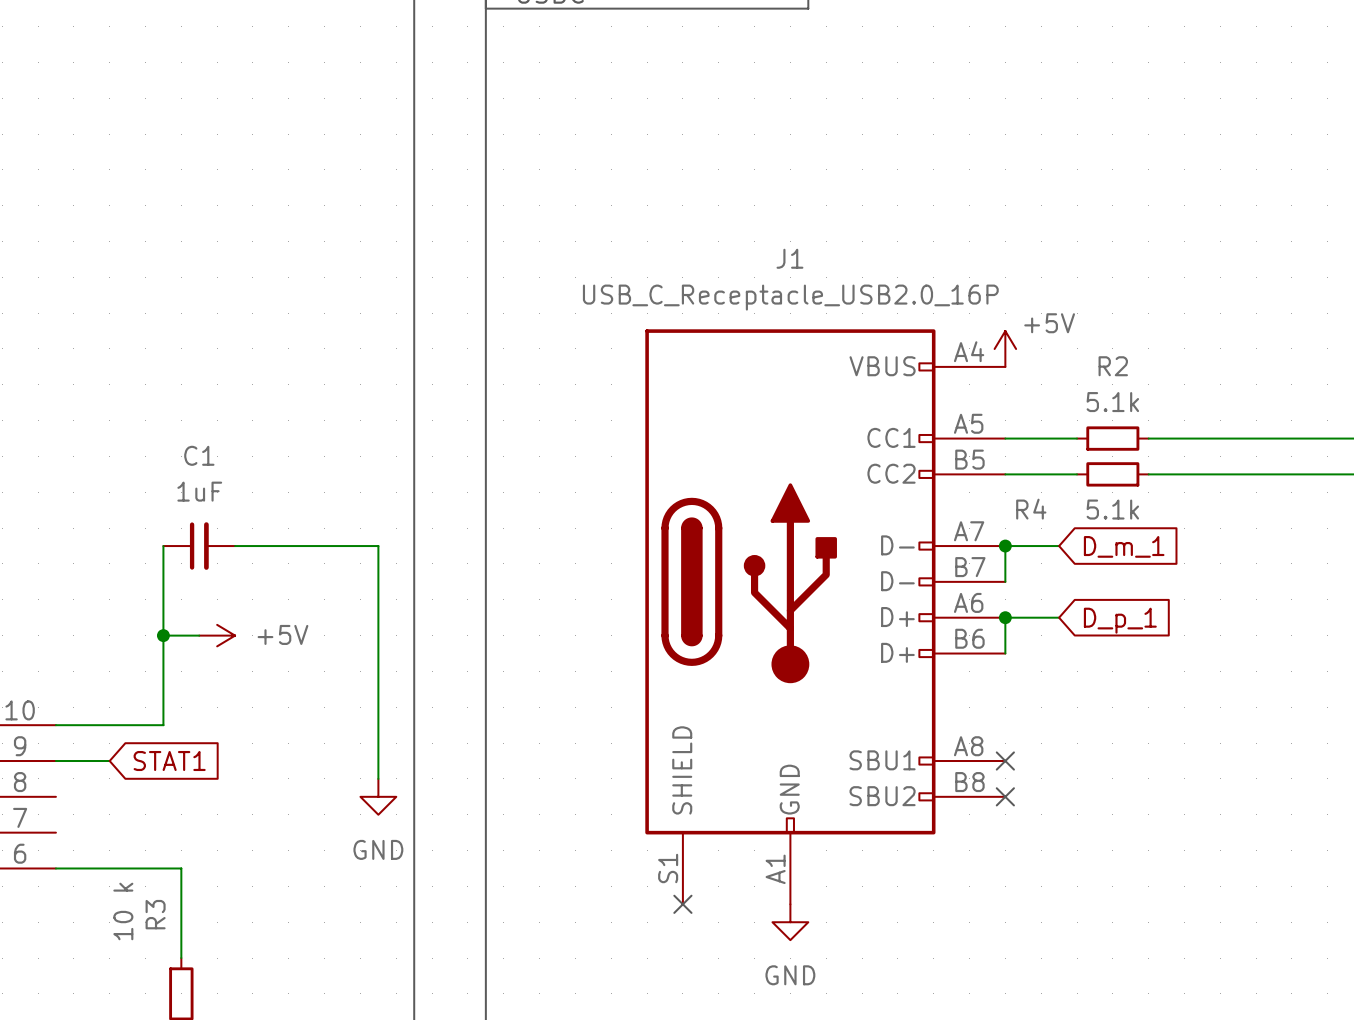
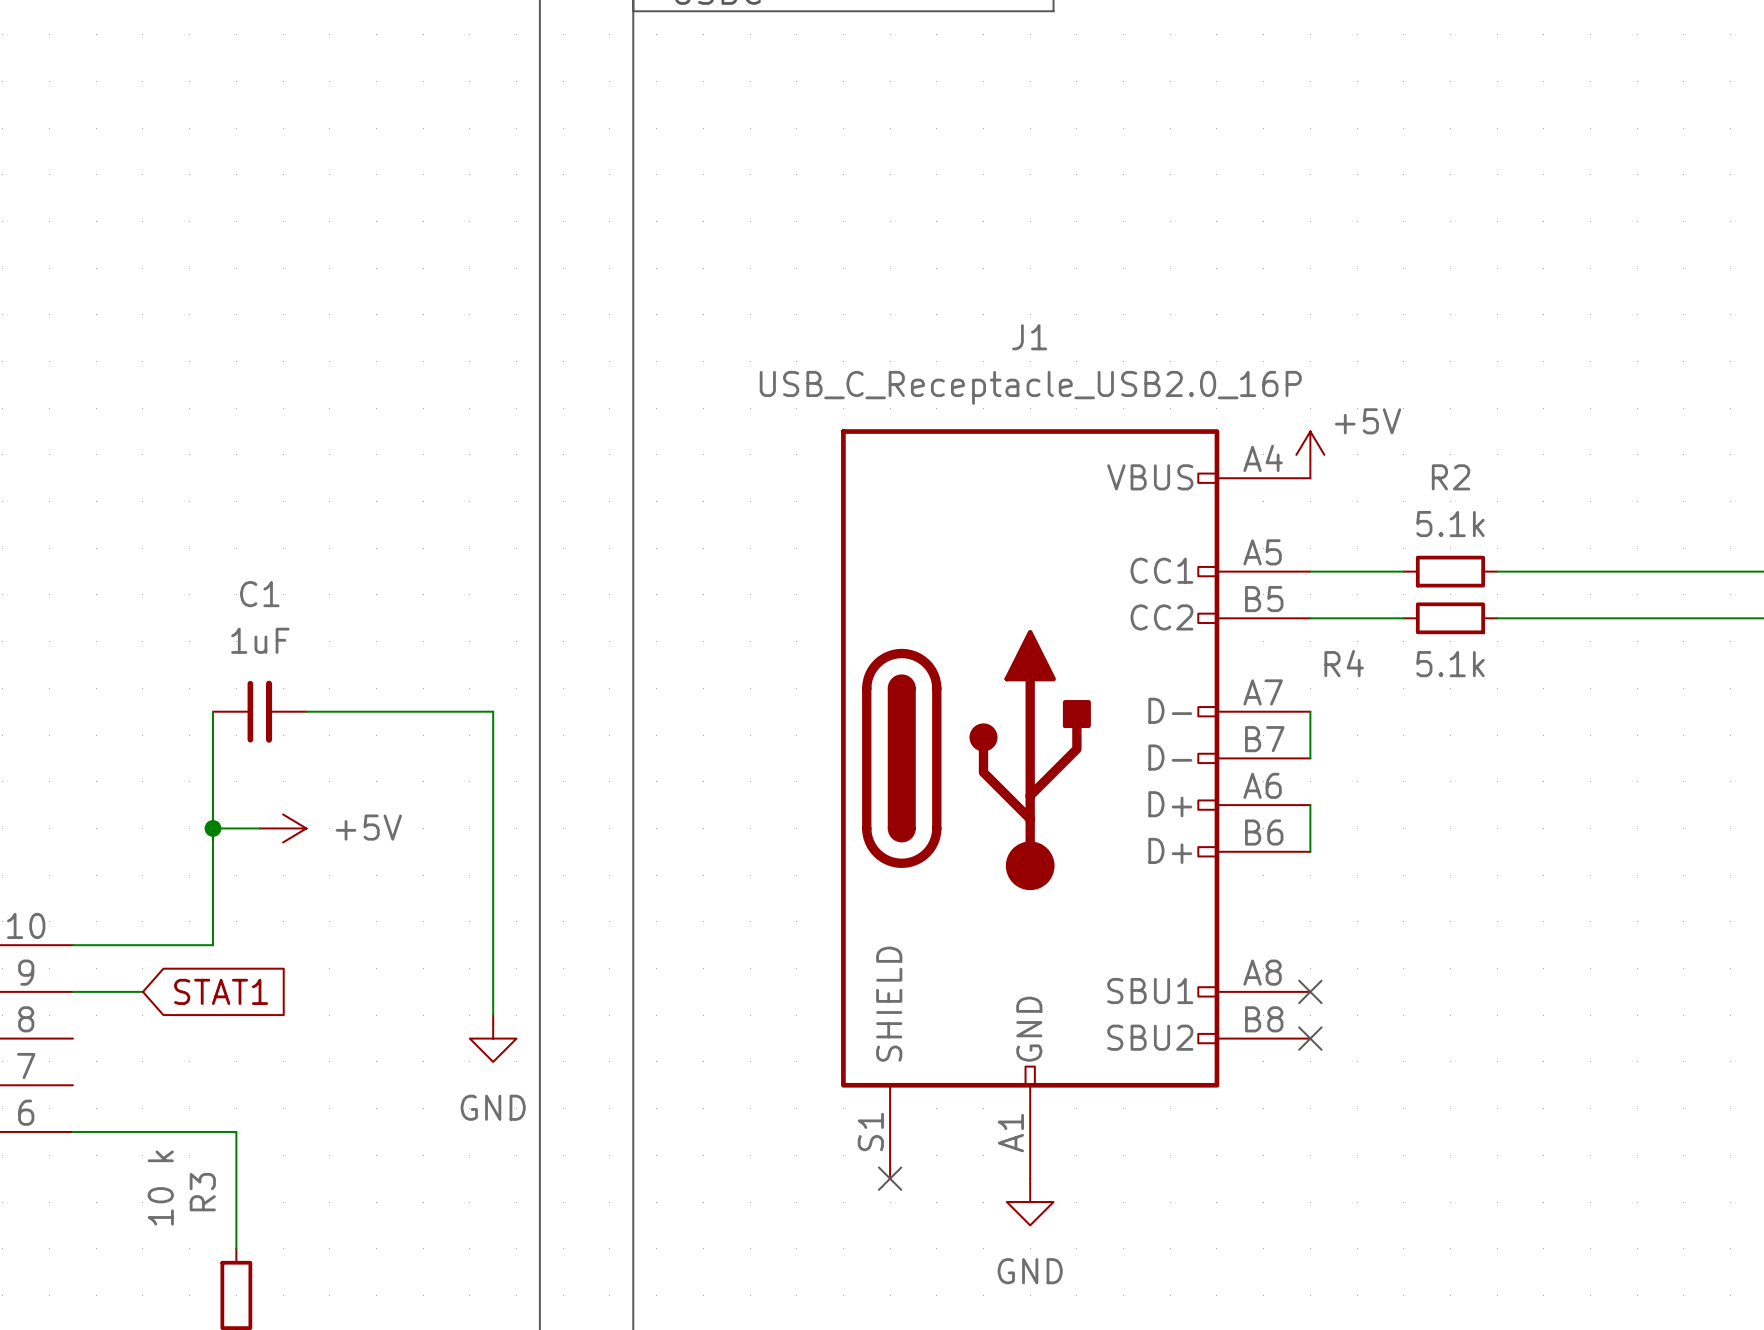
wire: (1005, 546) (1059, 546) -> none
junction: (1005, 546) -> none
global label: D_m_1 (1124, 546) -> none
wire: (1005, 617) (1059, 617) -> none
junction: (1005, 617) -> none
global label: D_p_1 (1120, 620) -> none

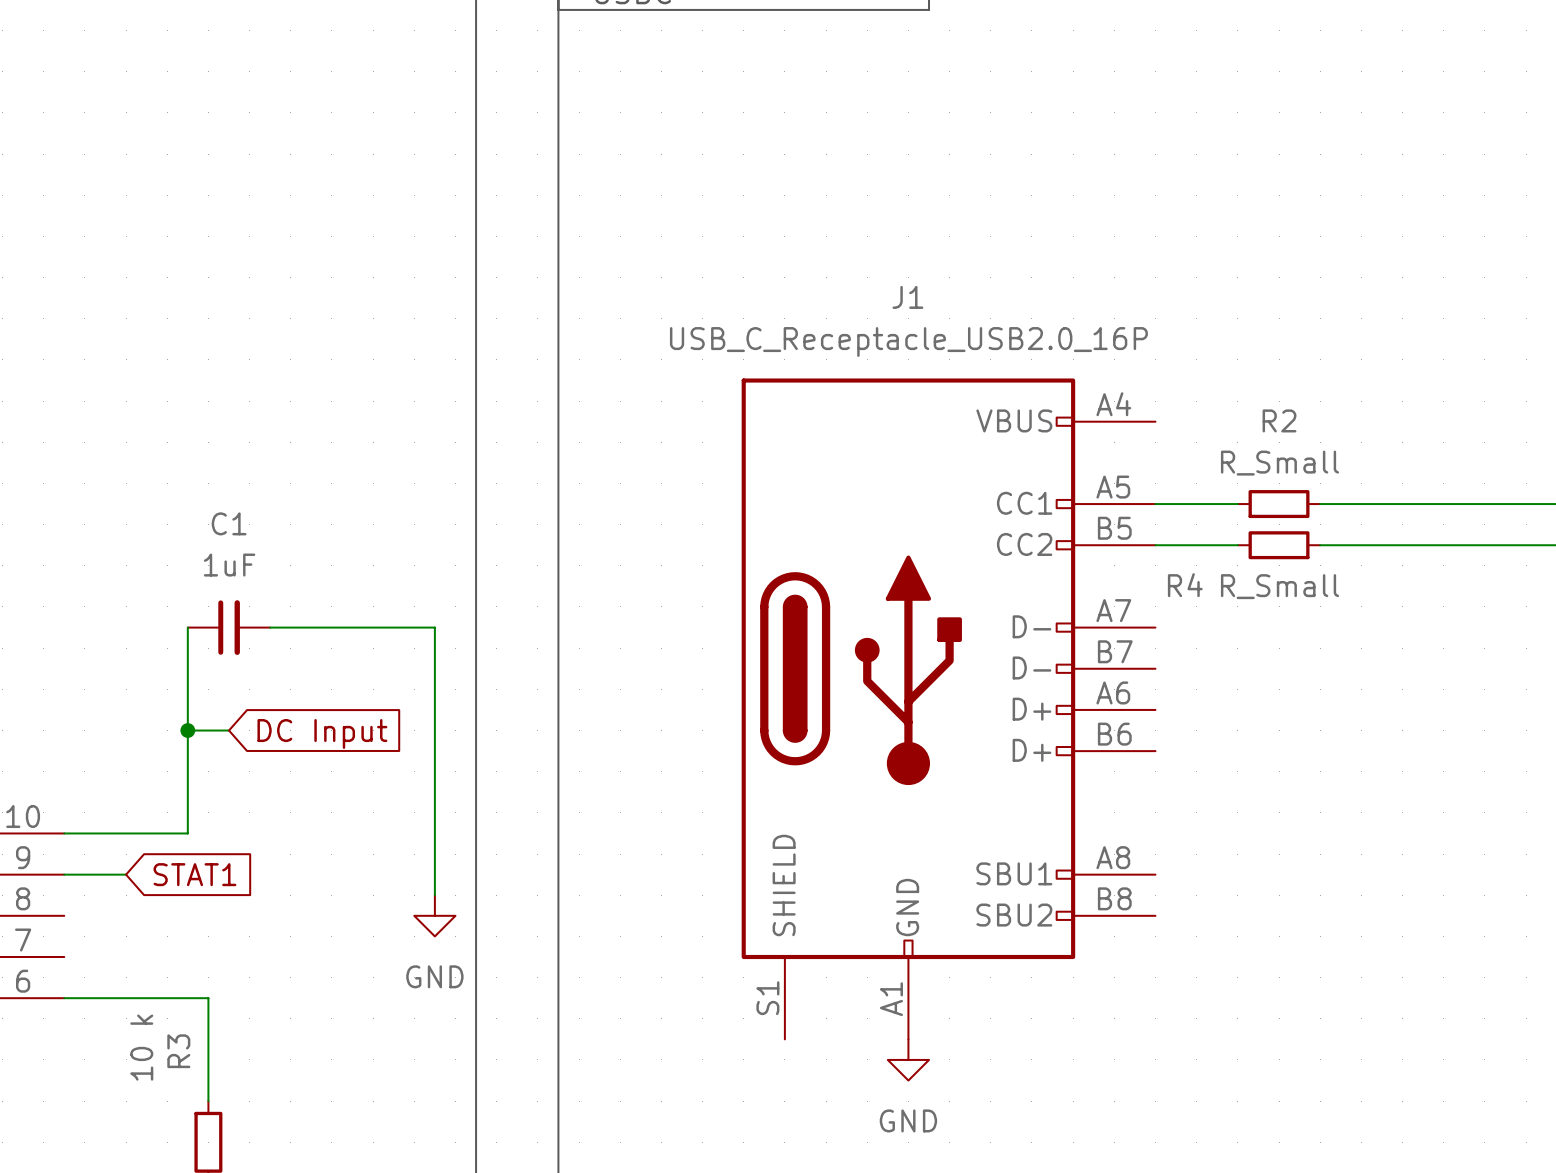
power symbol: +5V (1310, 454) -> none
R2 value: 5.1k (1450, 524) -> R_Small (1279, 463)
R4 value: 5.1k (1450, 664) -> R_Small (1279, 586)
wire: (1310, 711) (1310, 758) -> none
wire: (1310, 805) (1310, 851) -> none
power symbol: +5V (283, 828) -> none
global label: none -> DC Input (322, 733)
no-connect mark: (1310, 991) -> none
no-connect mark: (1310, 1038) -> none
no-connect mark: (890, 1178) -> none

